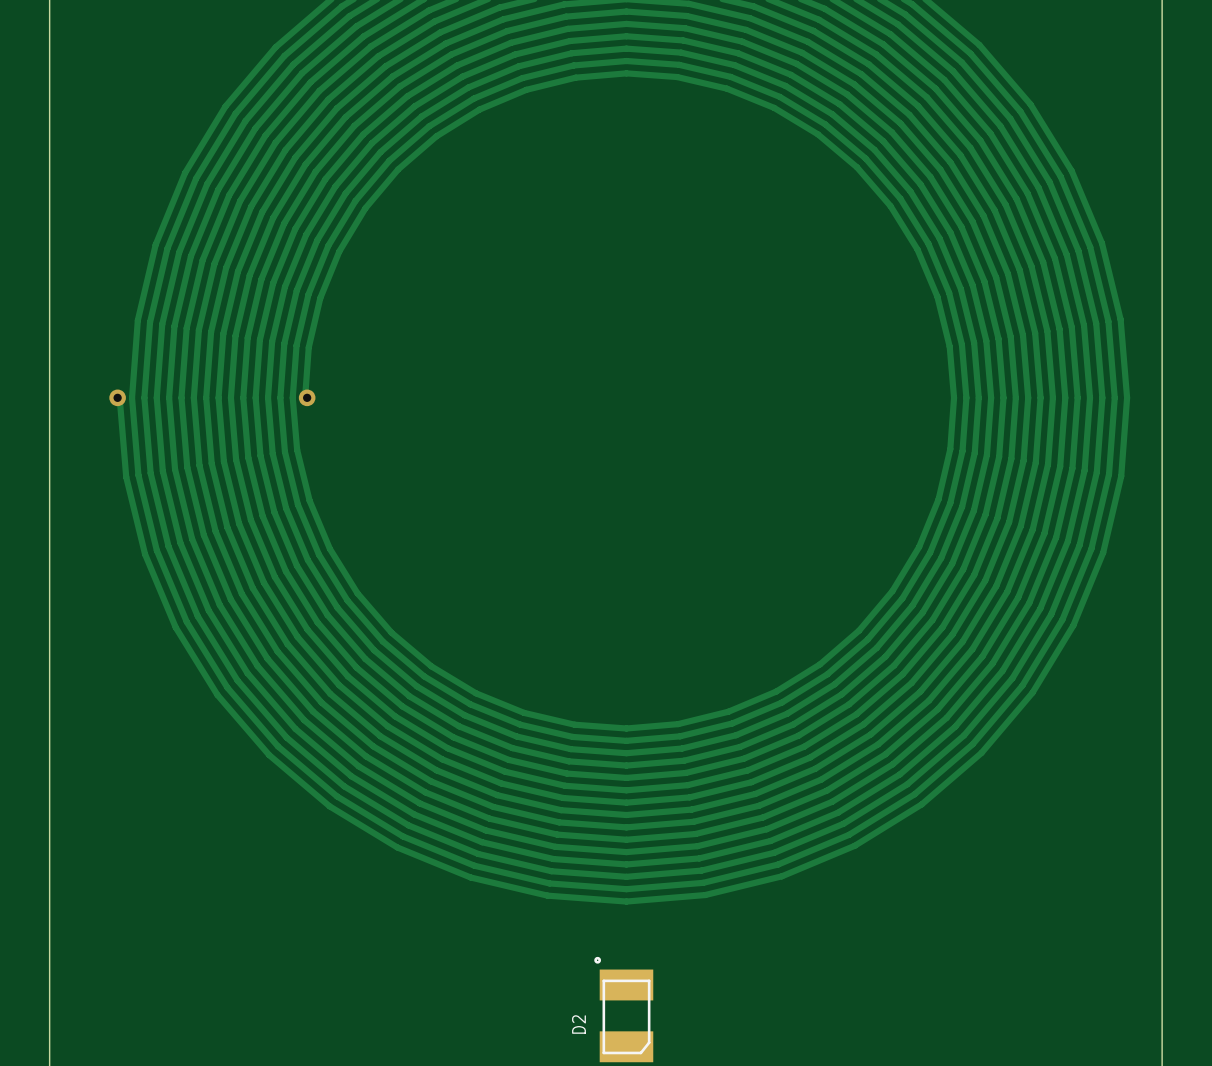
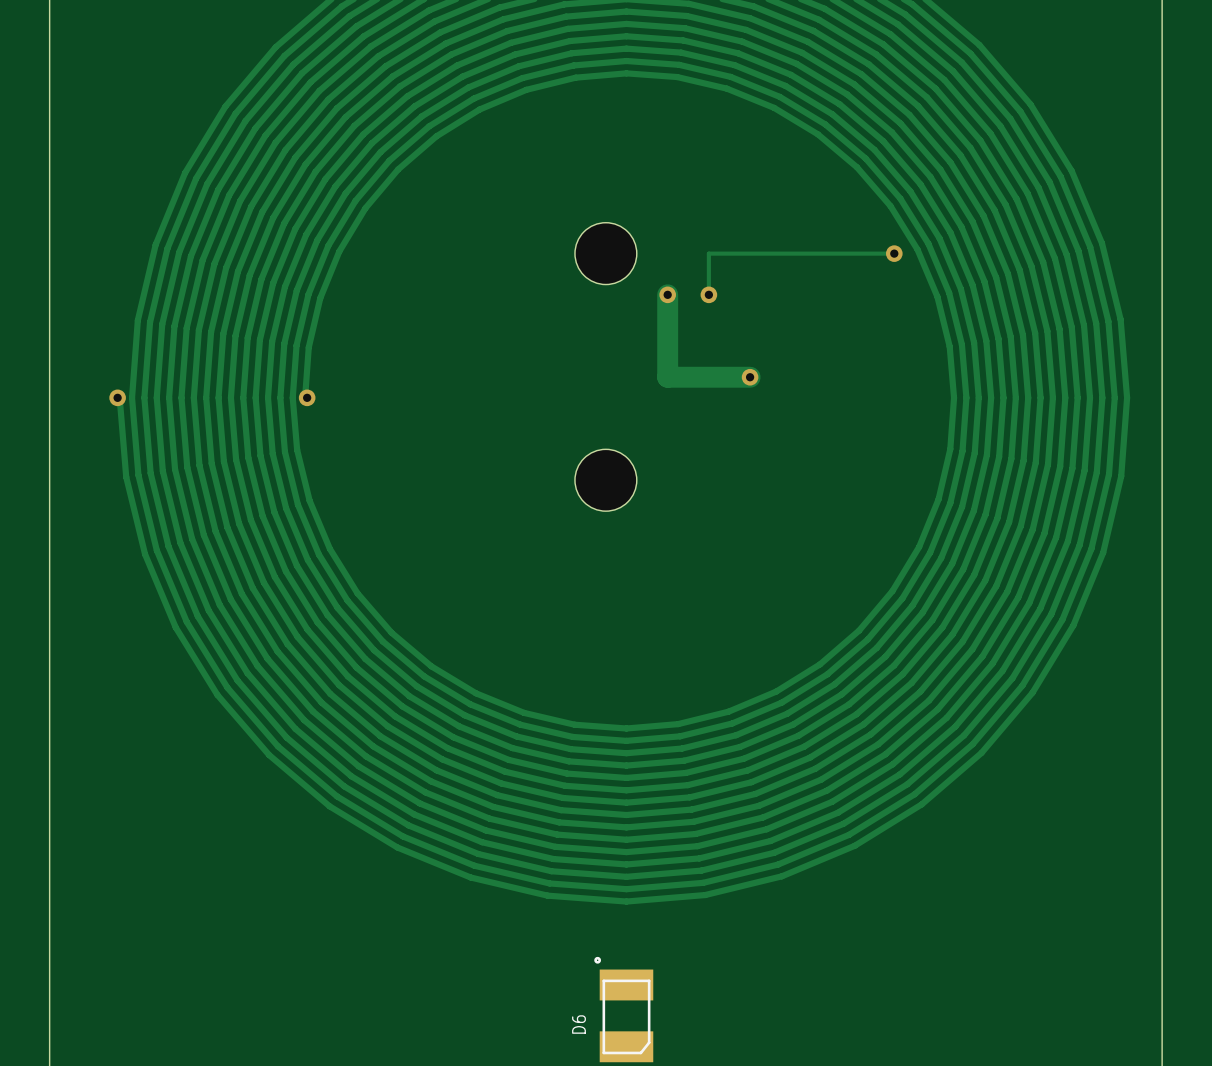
hole: none -> (605, 253)
track: none -> (894, 253) (708, 253) (708, 294)
via: none -> (894, 253)
track: none -> (667, 294) (667, 377) (750, 377)
via: none -> (667, 294)
via: none -> (708, 294)
via: none -> (750, 377)
hole: none -> (605, 480)
D2 name: D2 (578, 1024) -> D6 (578, 1024)

